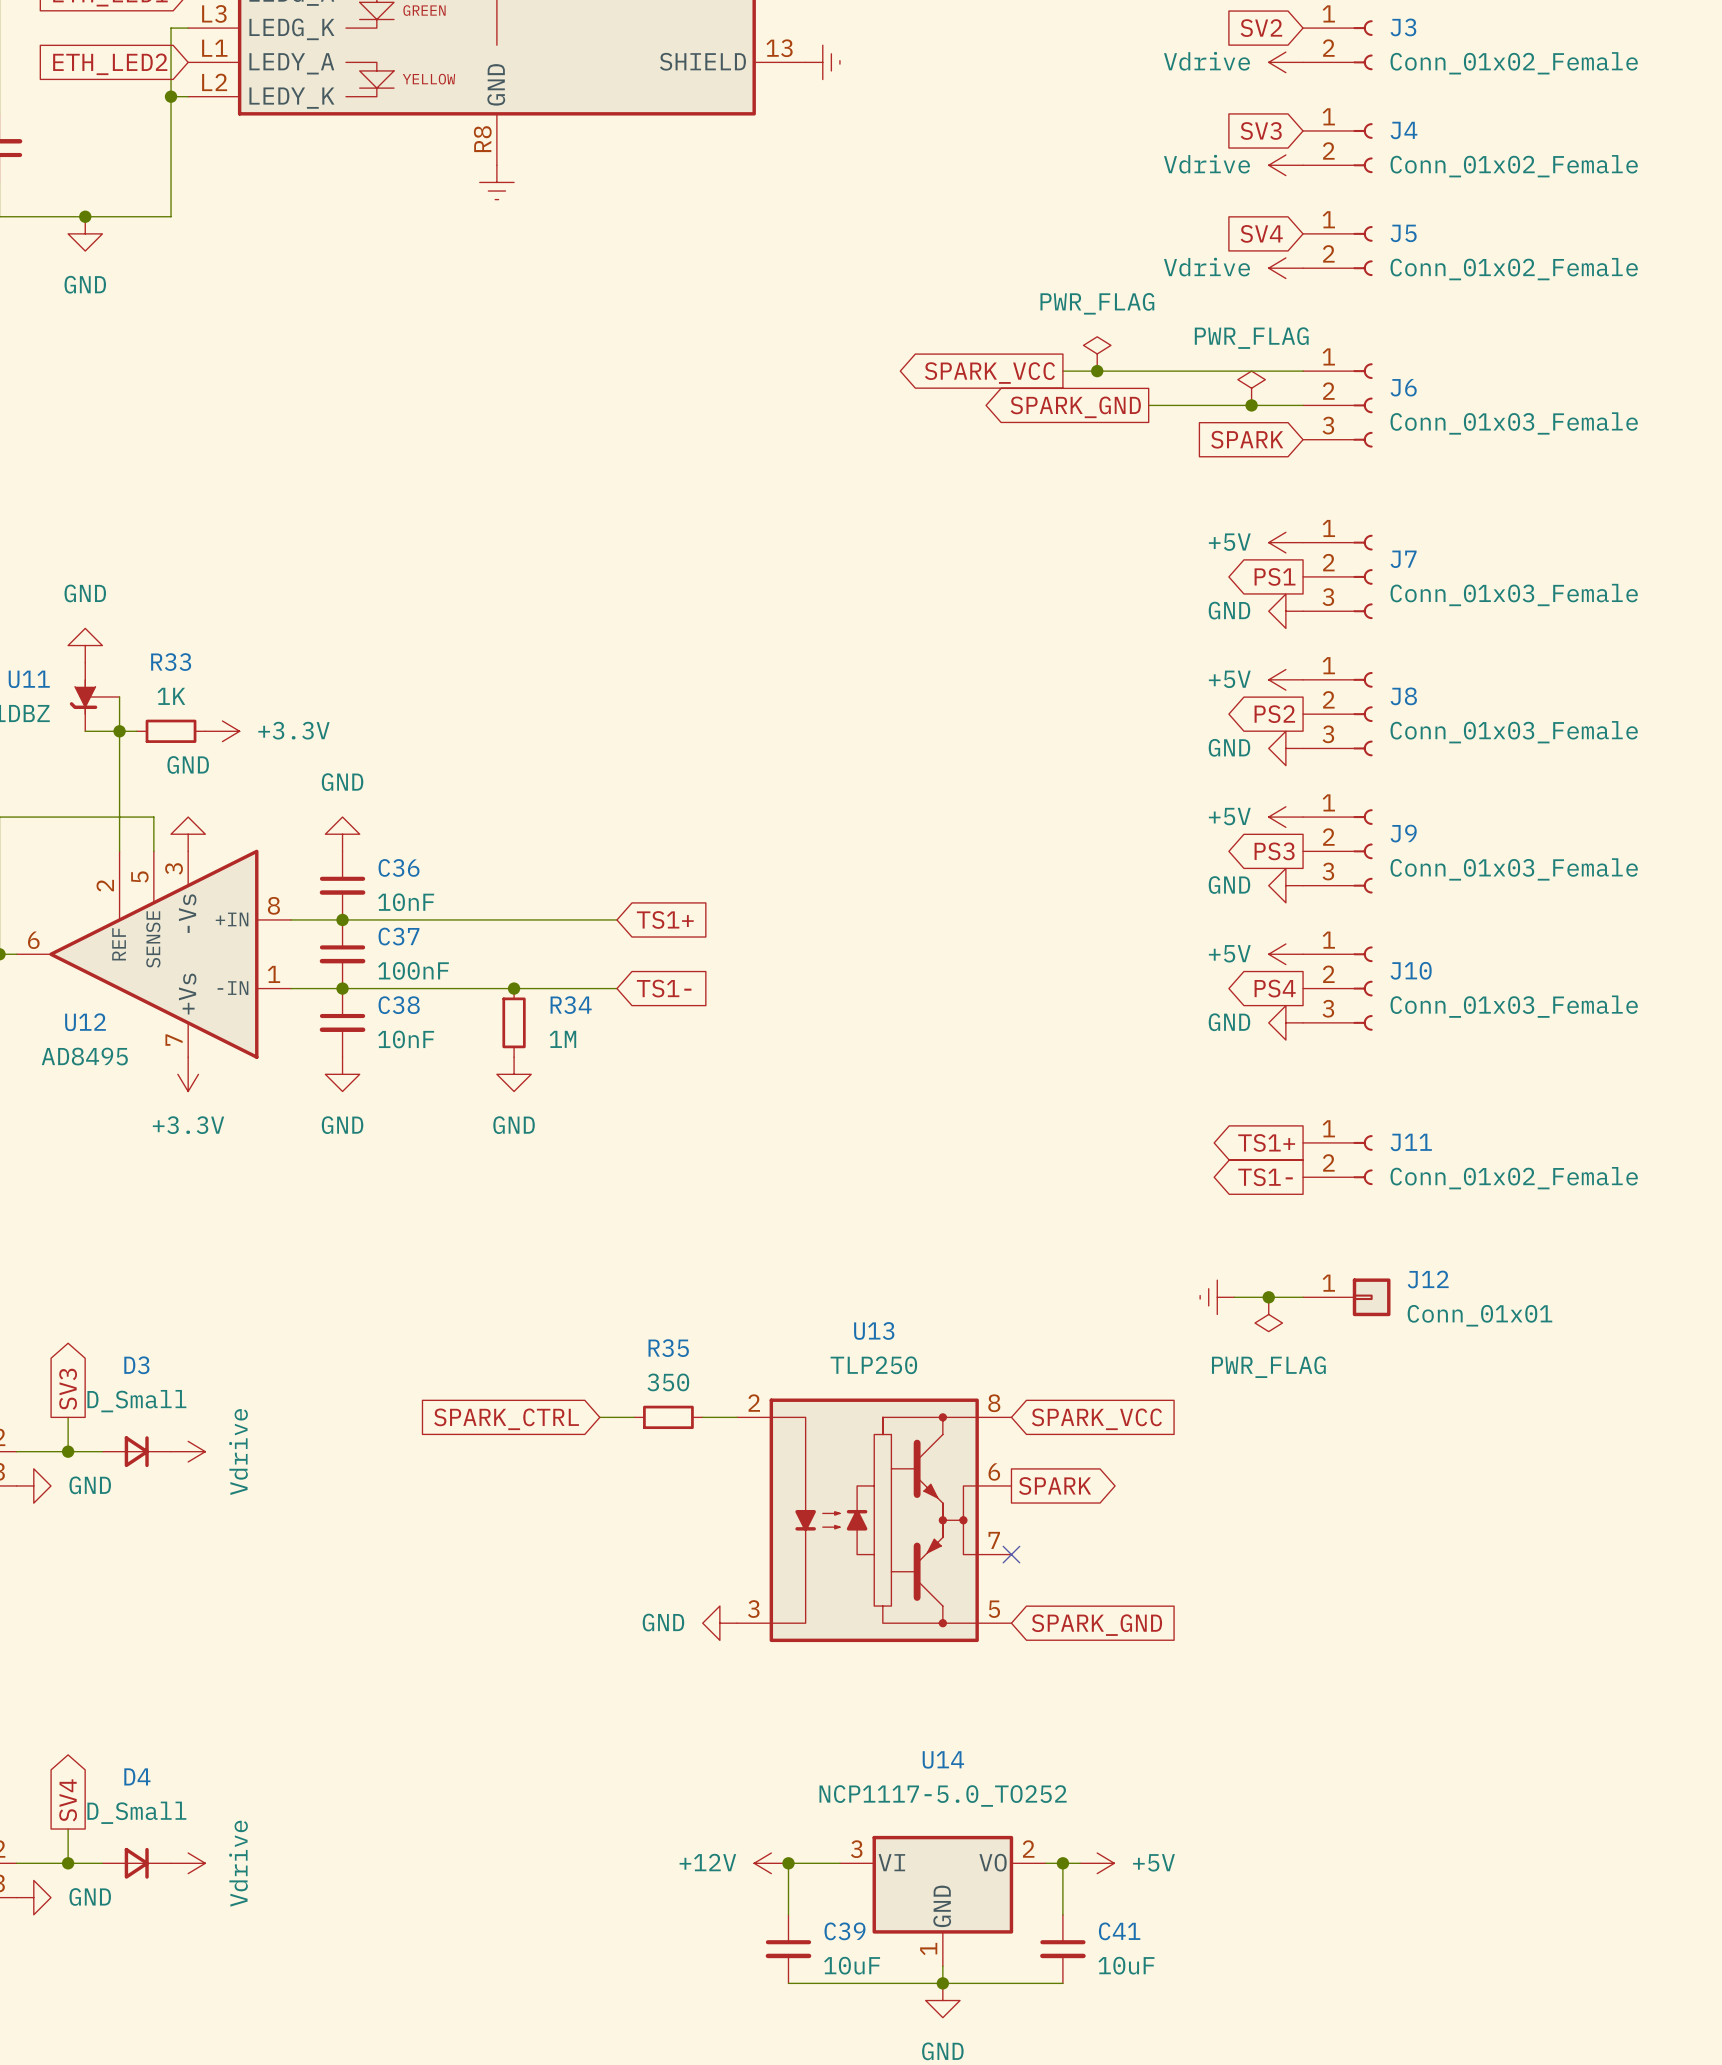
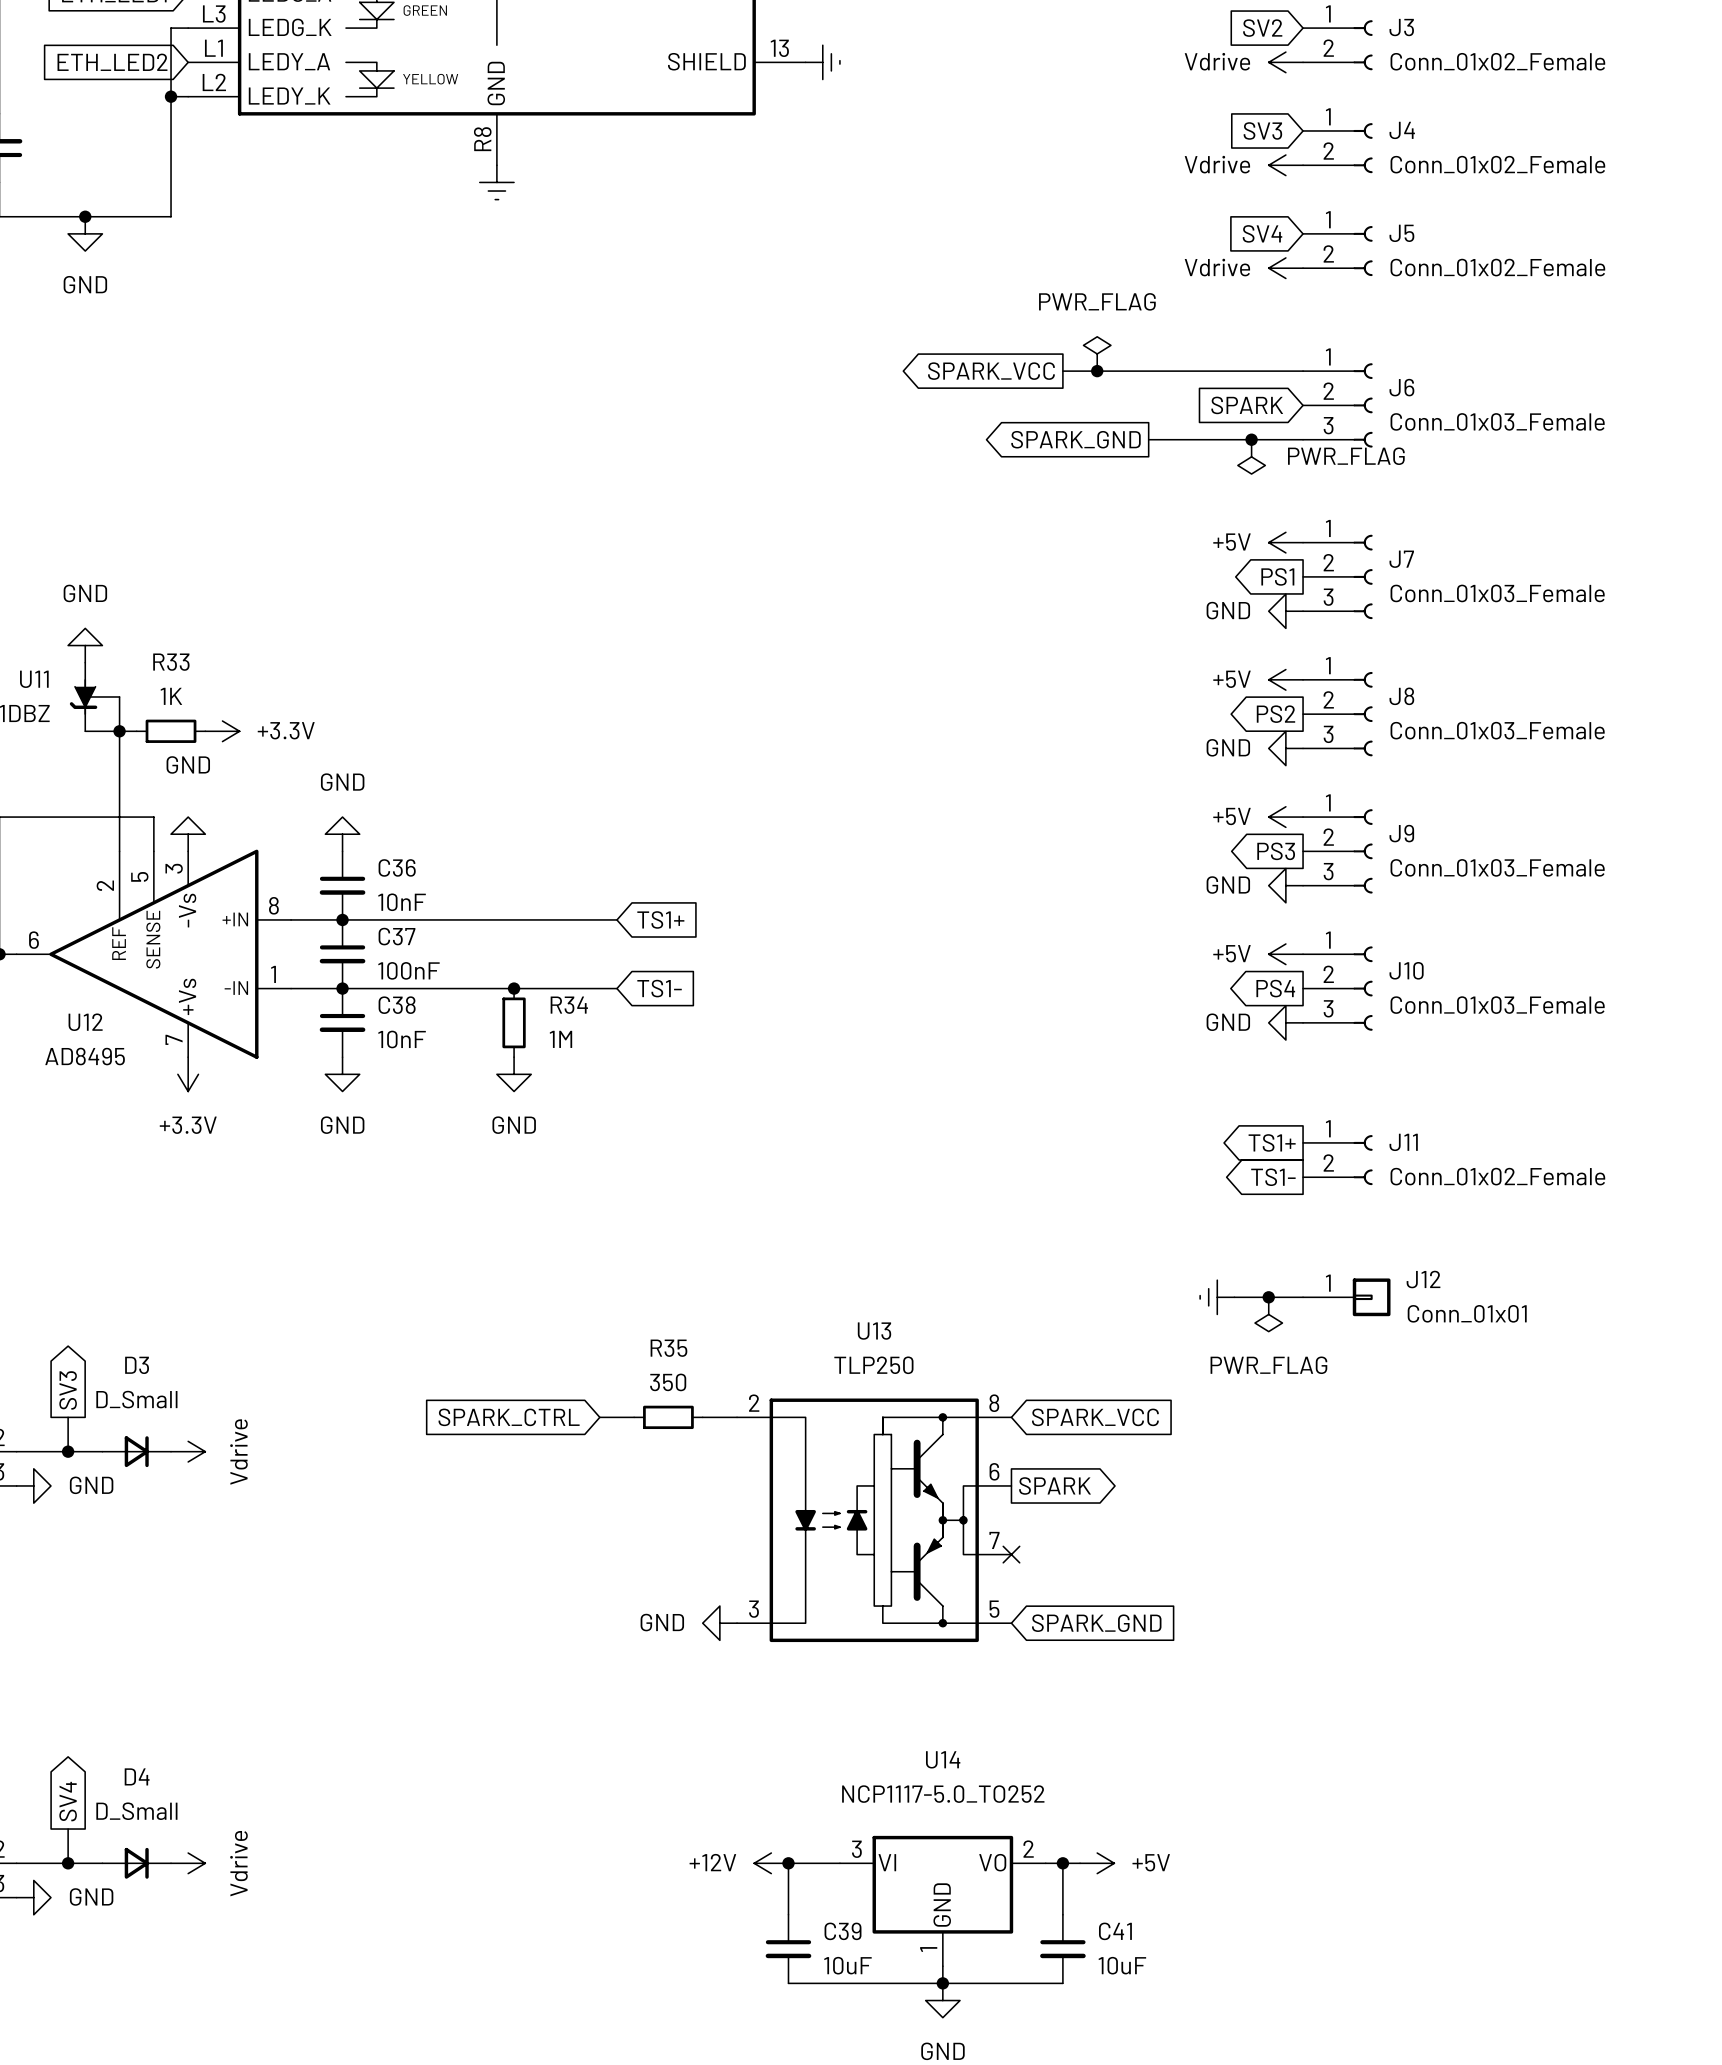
power symbol text position: PWR_FLAG (1251, 338) -> PWR_FLAG (1346, 456)
power symbol rotation: 0° (1251, 388) -> 180° (1251, 456)
power symbol position: PWR_FLAG (1251, 388) -> PWR_FLAG (1251, 456)
wire: (1148, 405) (1303, 405) -> (1148, 439) (1303, 439)
junction position: (1251, 405) -> (1251, 439)
global label position: SPARK_GND (1075, 407) -> SPARK_GND (1076, 439)
global label position: SPARK (1247, 439) -> SPARK (1247, 405)

